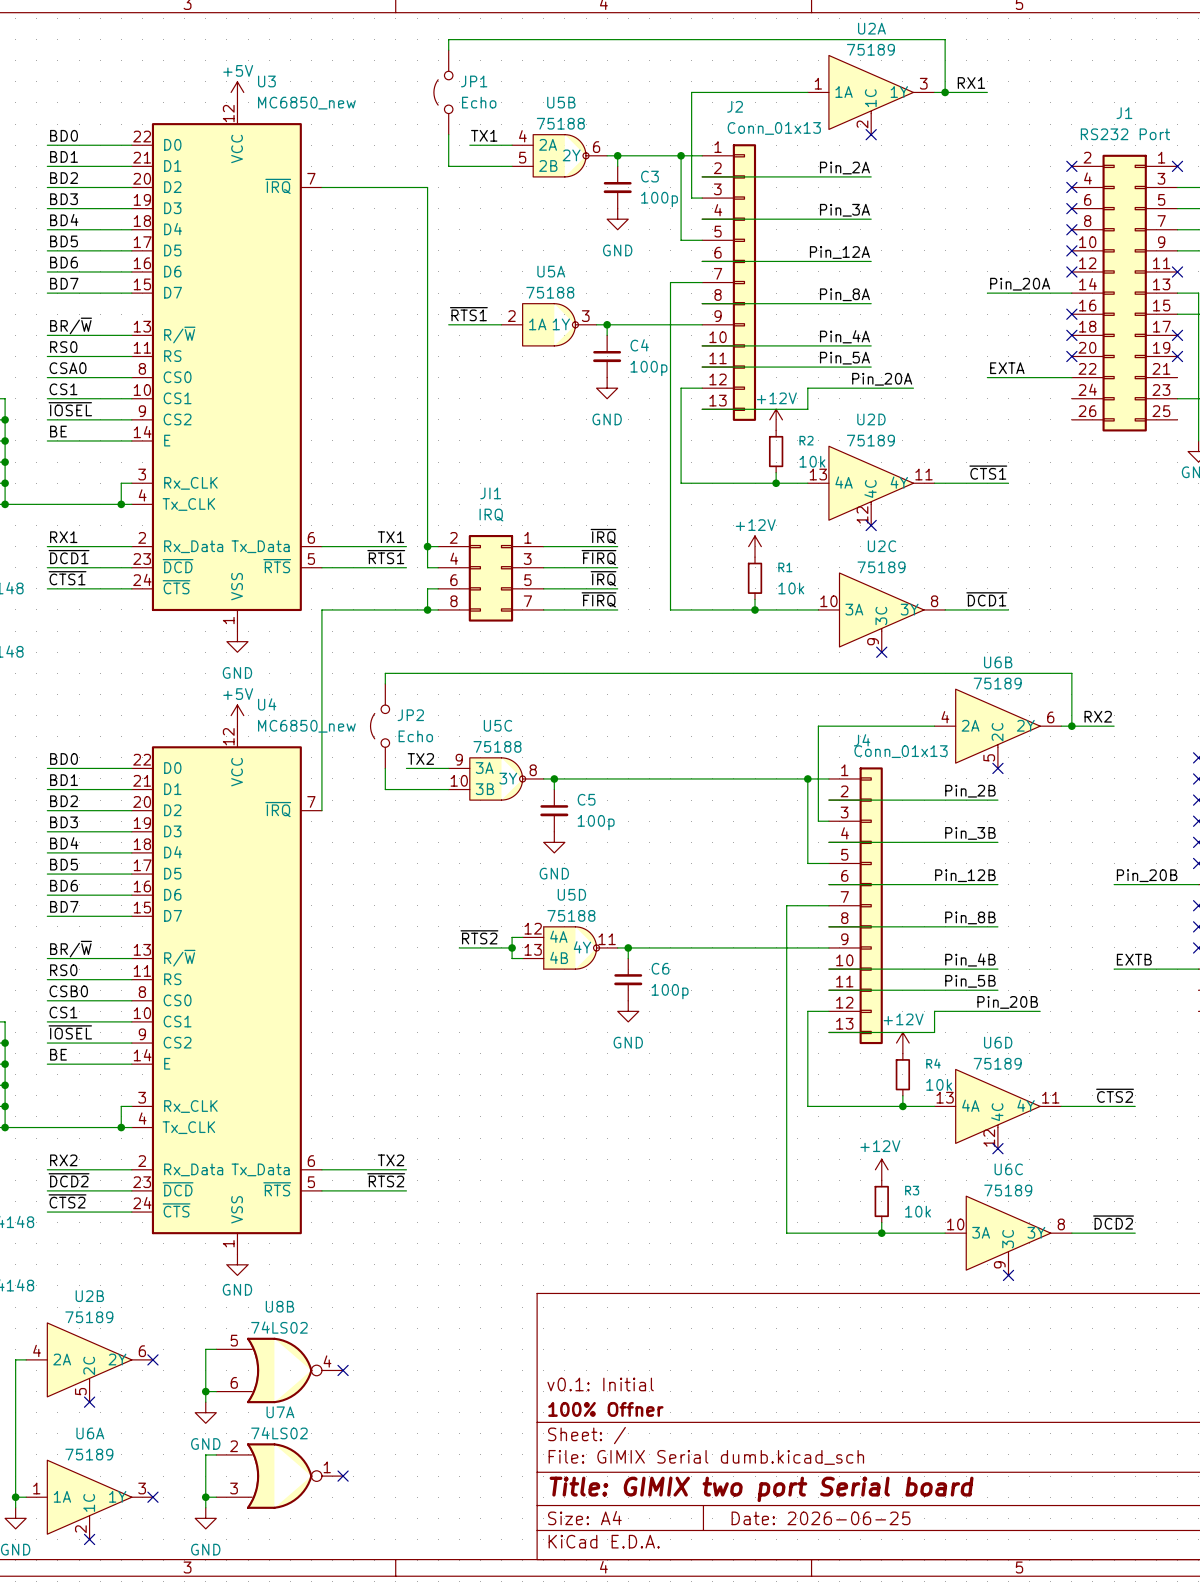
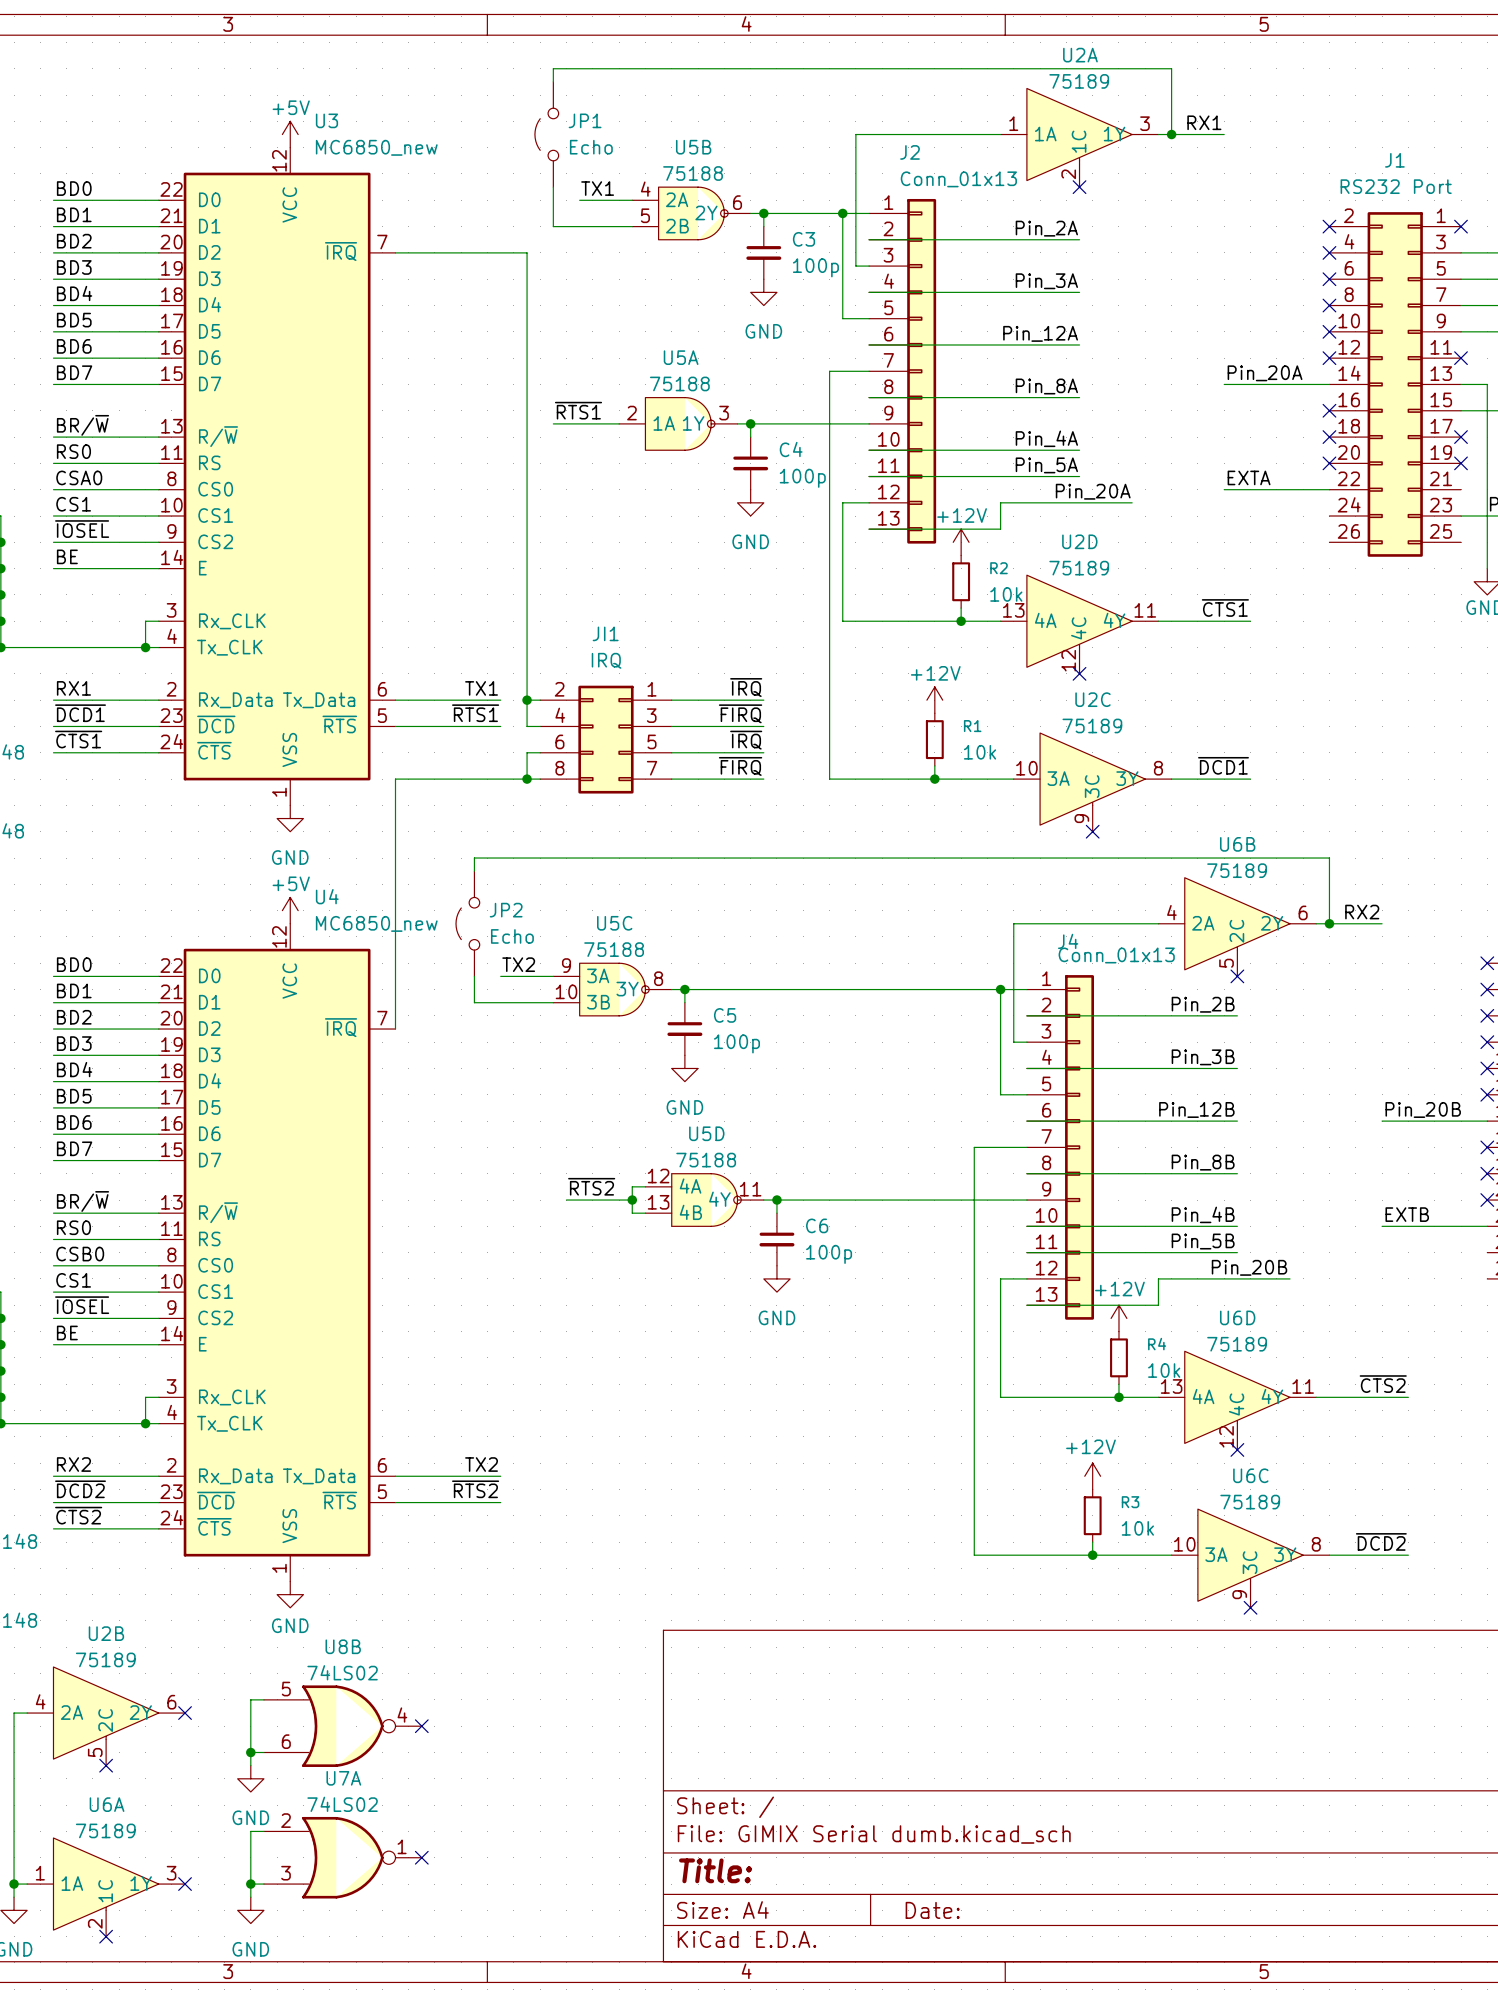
title block: v0.1: Initial (600, 1384) -> none
title block: 100% Offner (605, 1409) -> none
title block: Title: GIMIX two port Serial board (761, 1489) -> Title: (715, 1870)
title block: Date: 2026-06-25 (821, 1518) -> Date: (932, 1910)

